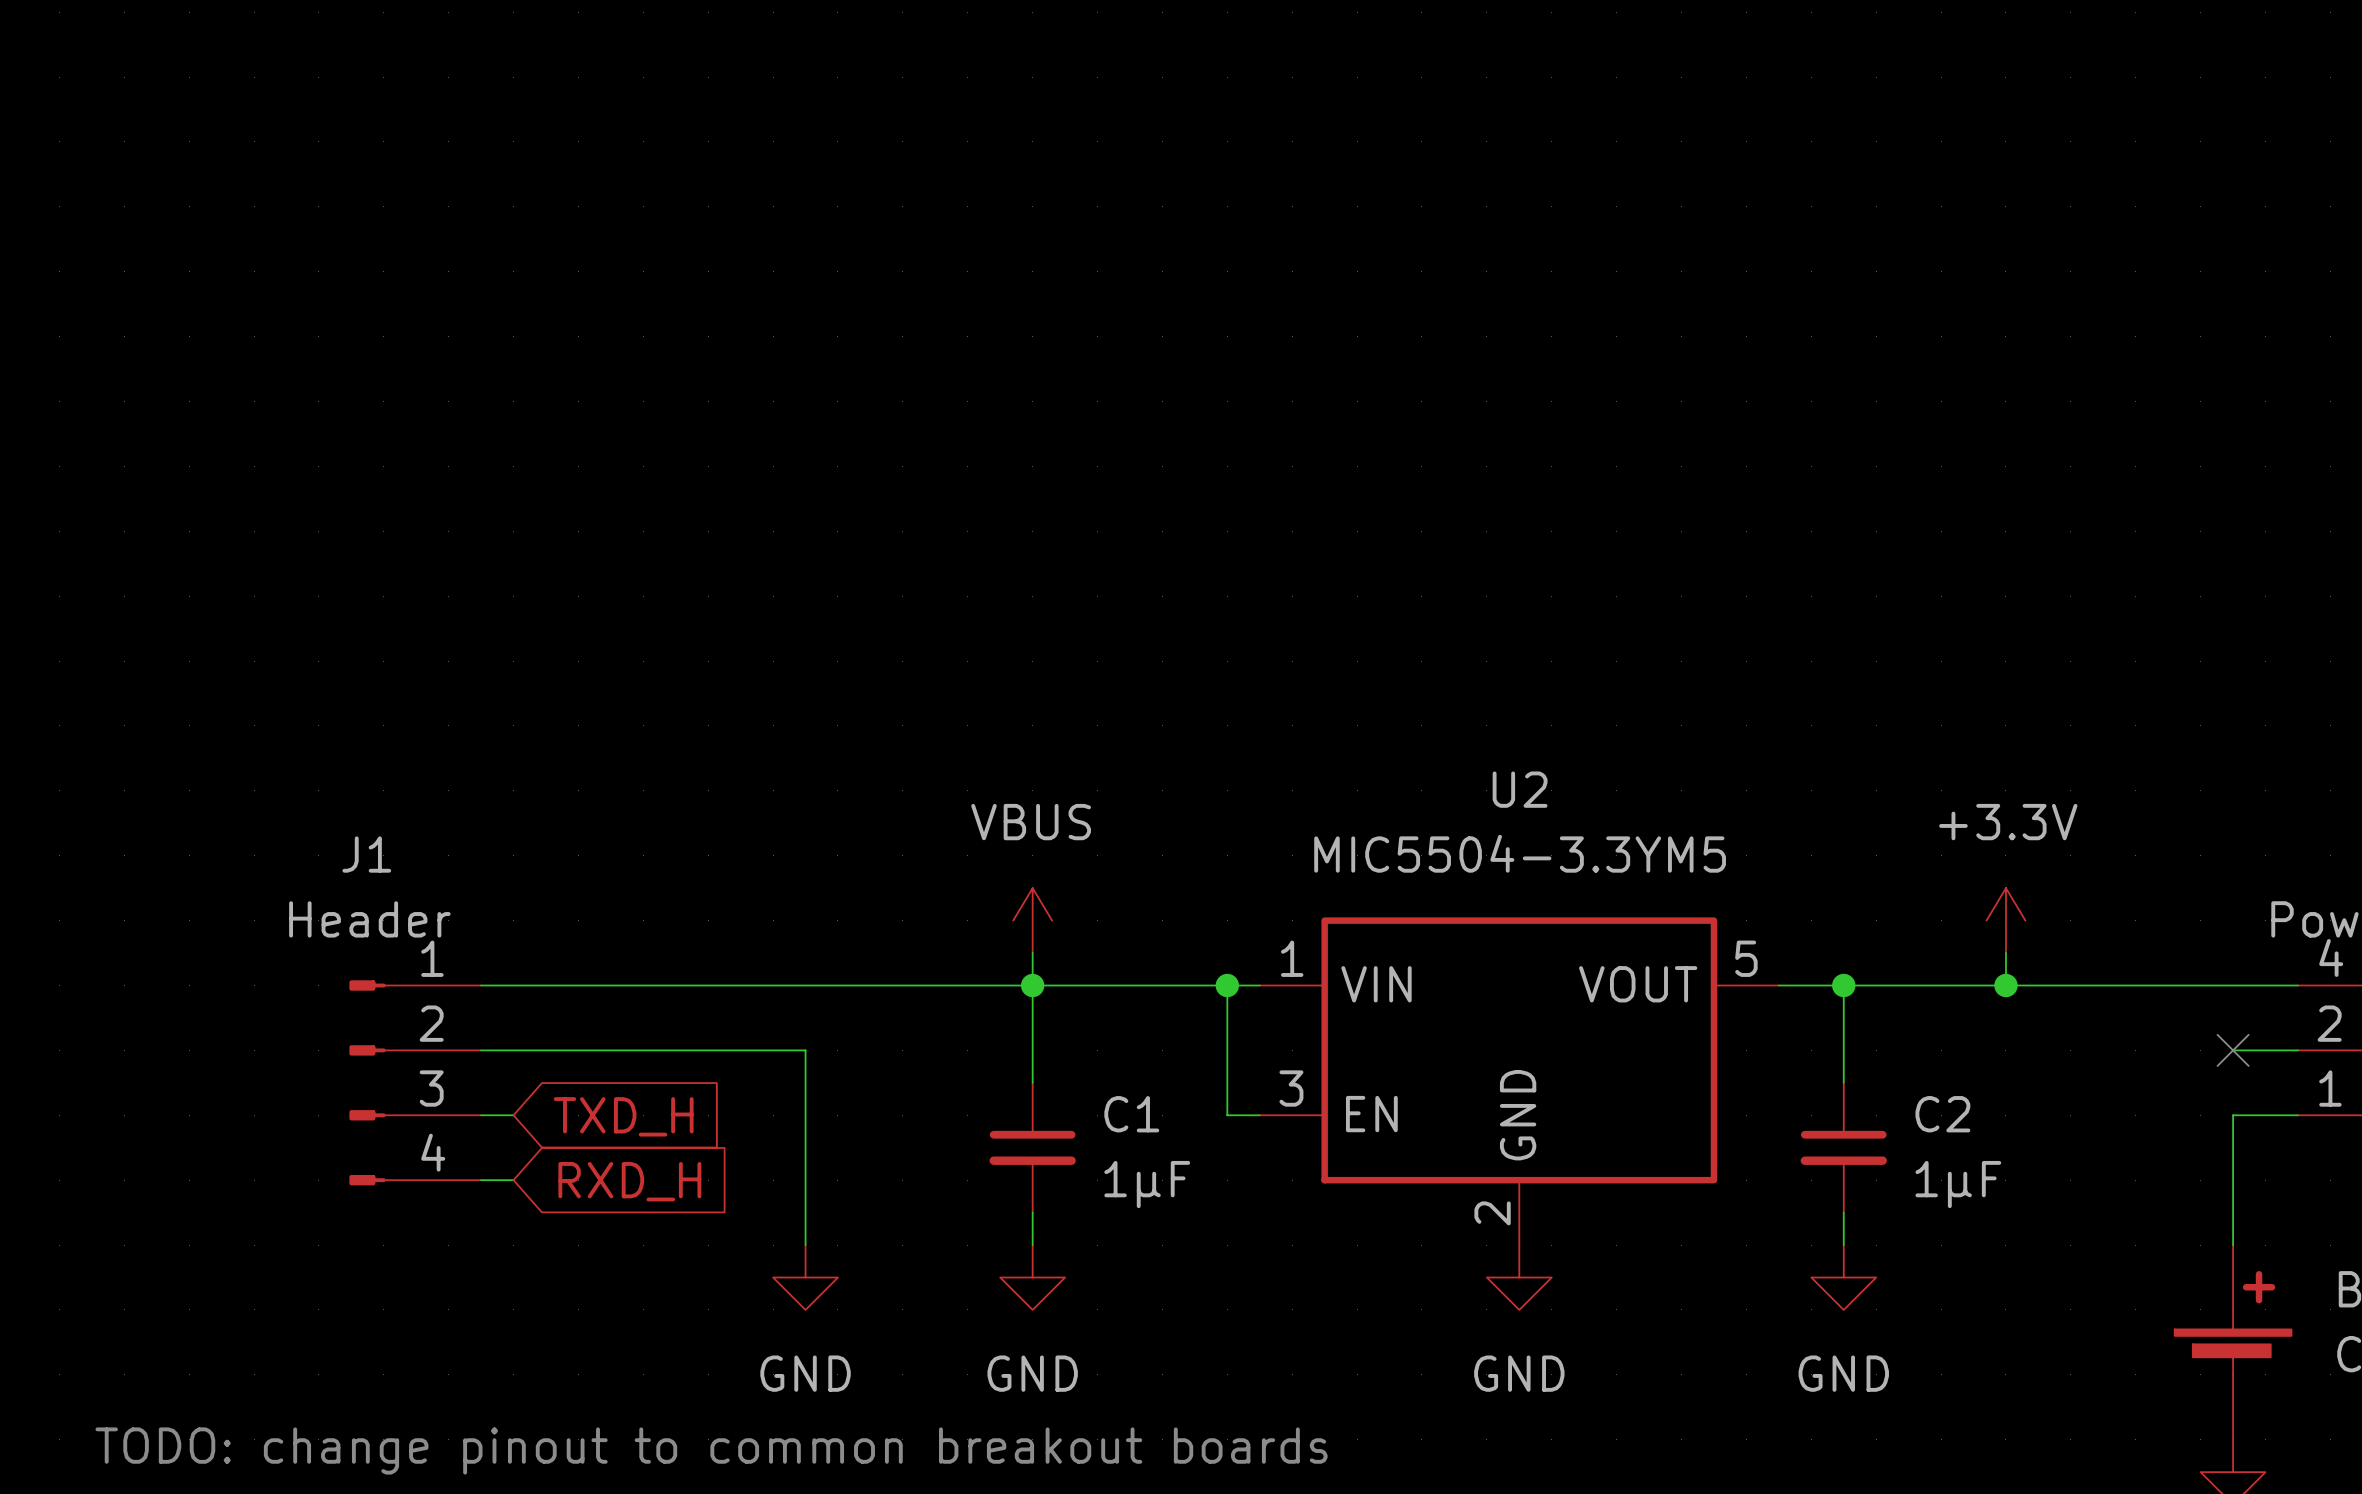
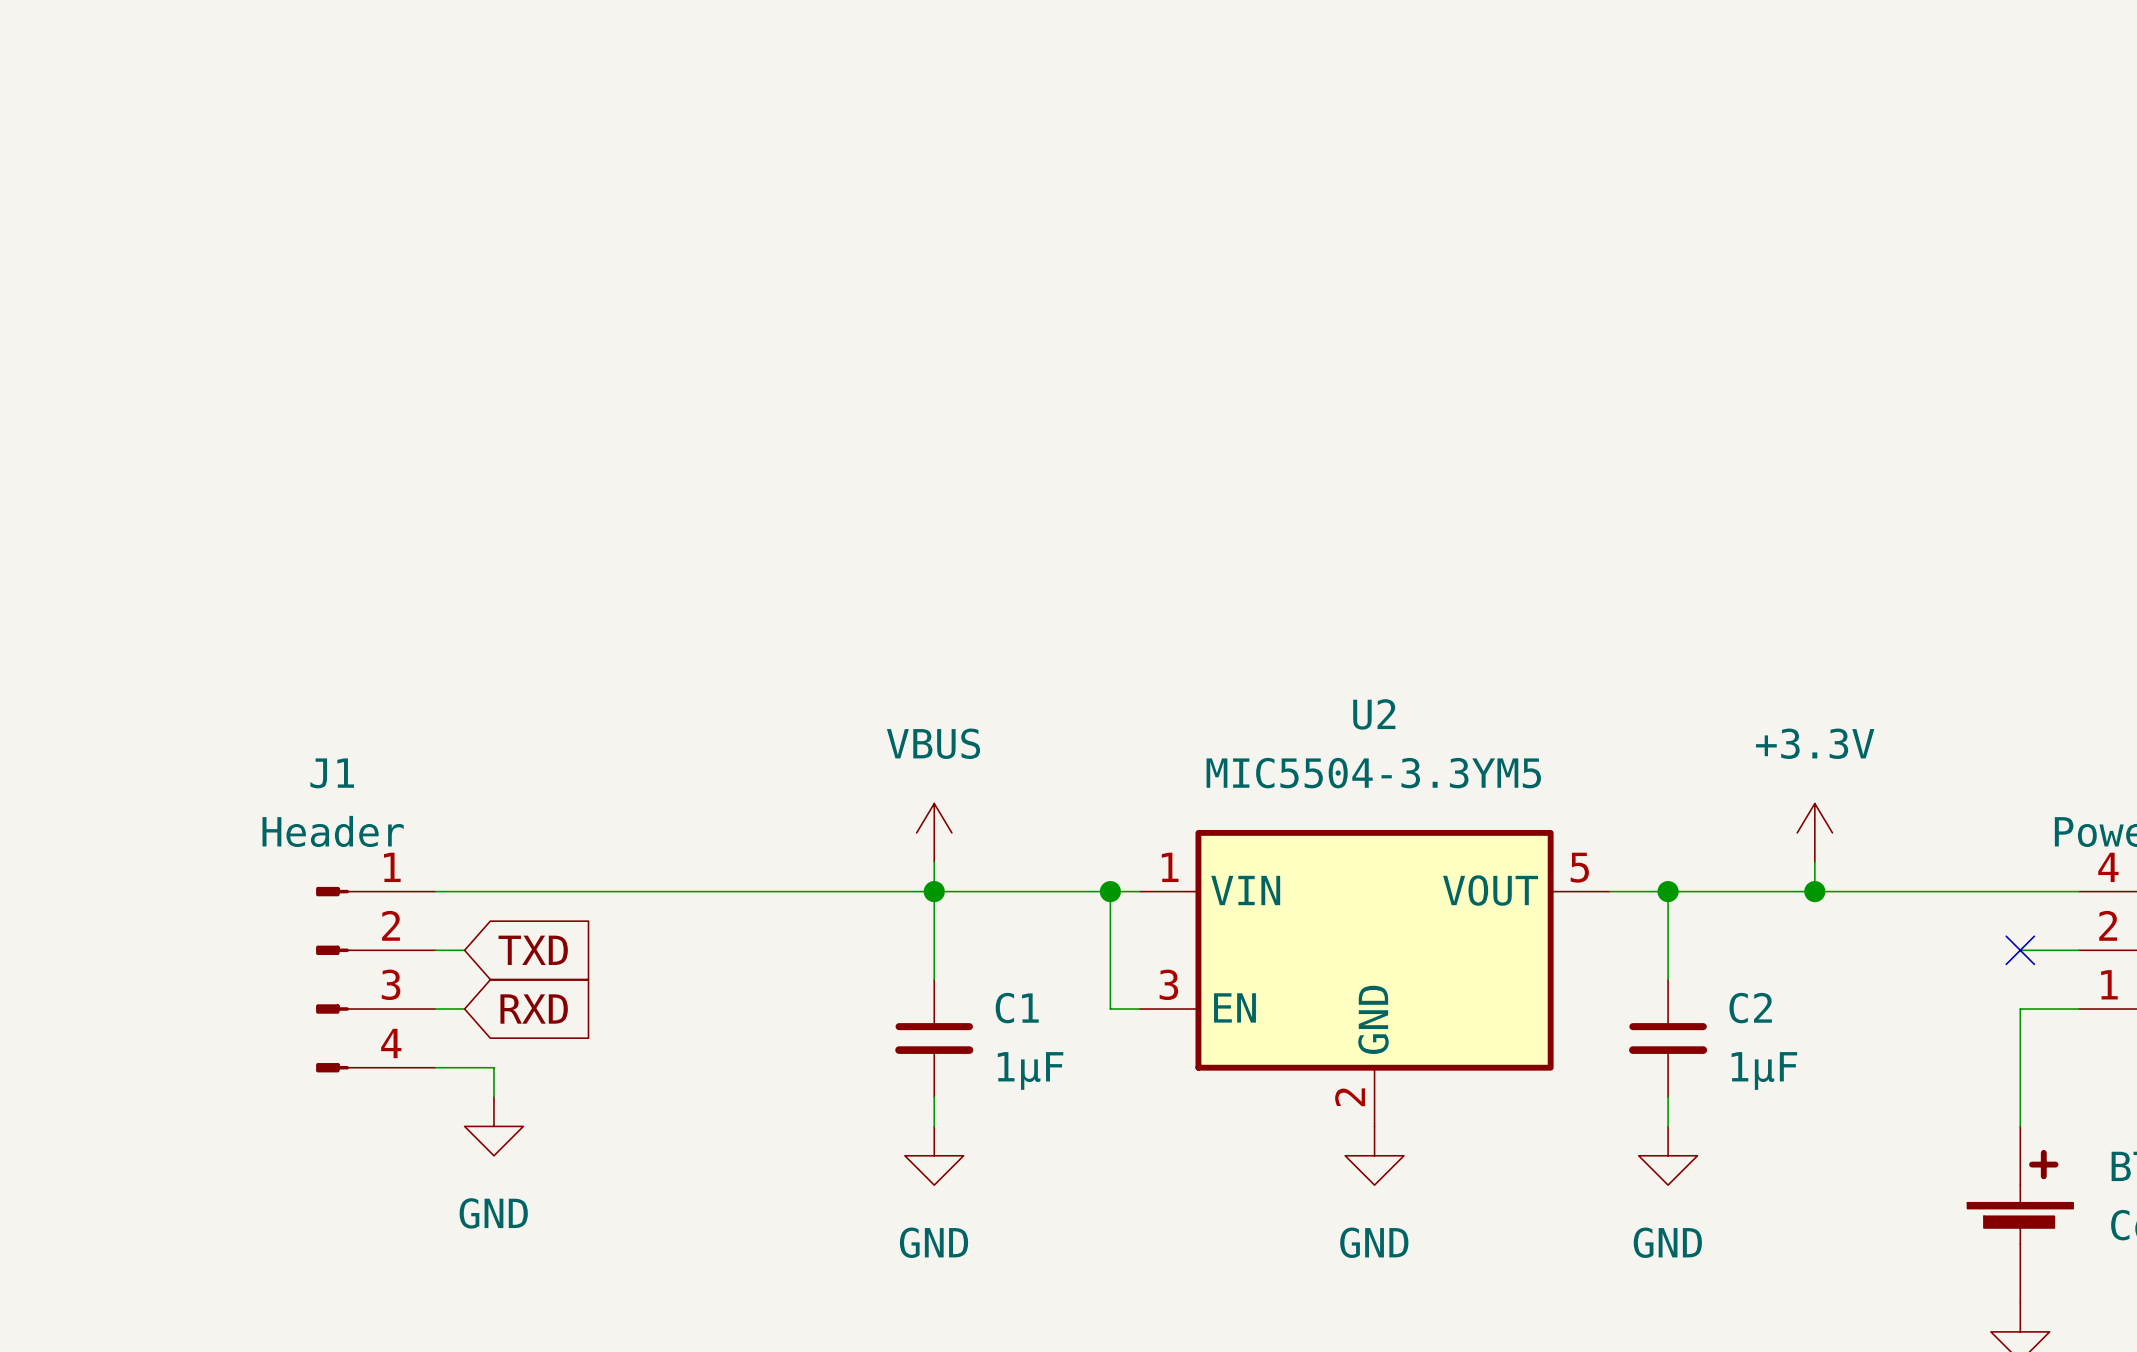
wire: (513, 1050) (805, 1050) (805, 1245) -> none
global label: none -> TXD (533, 950)
global label: TXD_H (623, 1116) -> RXD (534, 1009)
wire: none -> (464, 1067) (493, 1067) (493, 1097)
global label: RXD_H (629, 1181) -> none
power symbol position: GND (805, 1277) -> GND (493, 1126)
text: TODO: change pinout to common breakout boards (711, 1451) -> none

